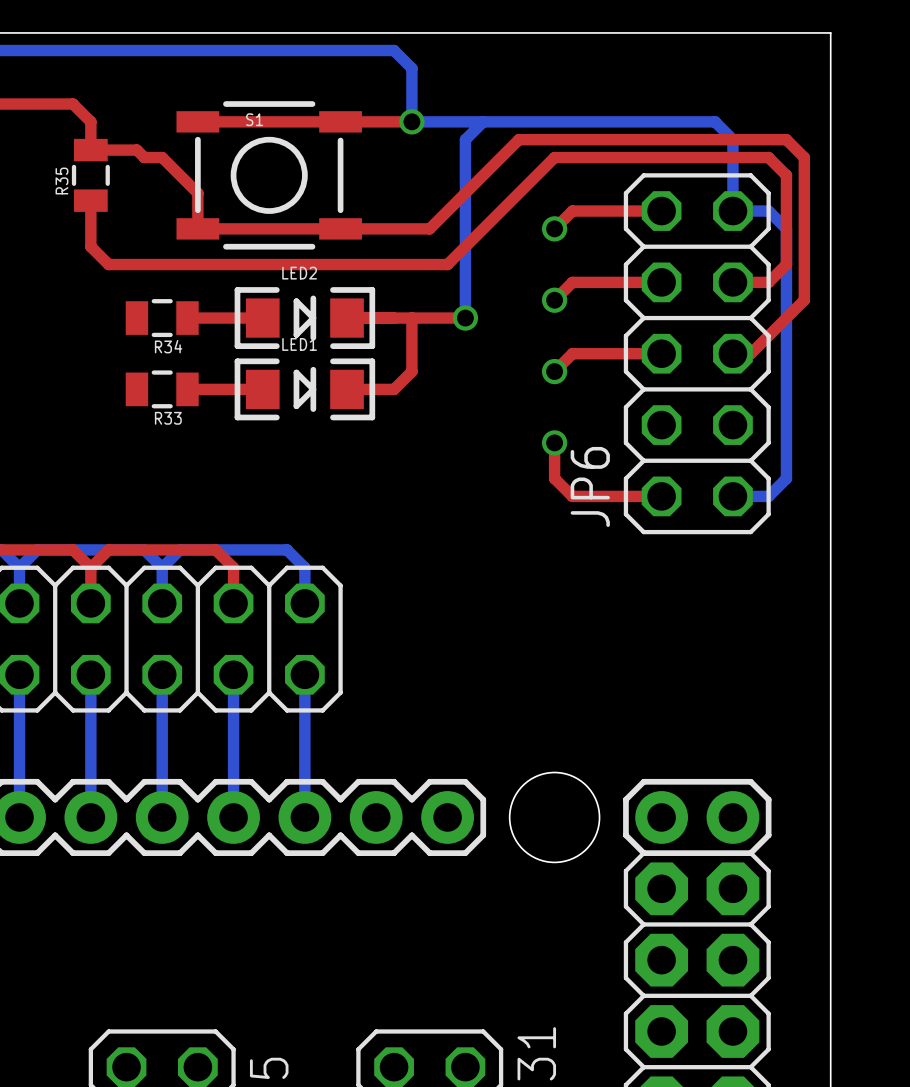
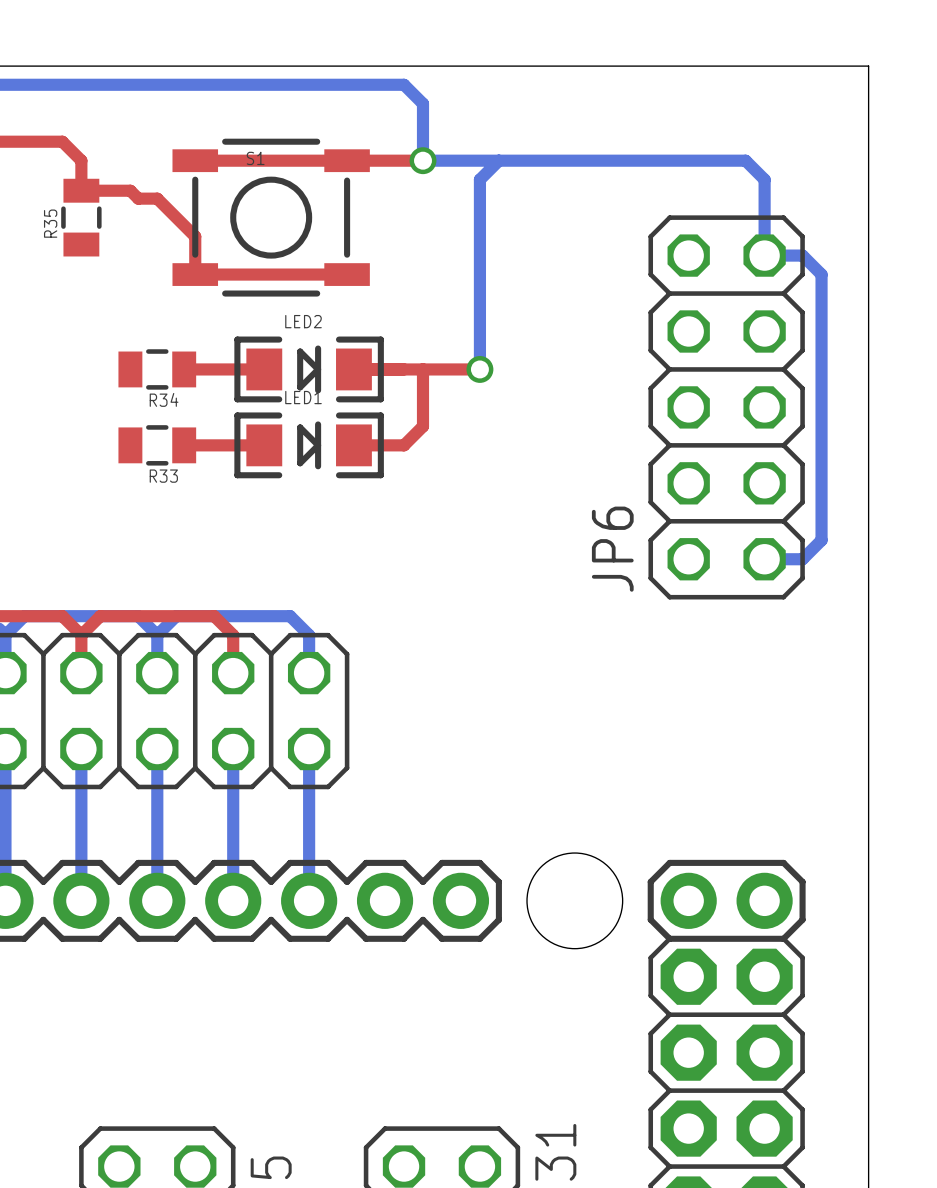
top track: (90, 200) (90, 246) (108, 264) (447, 264) (554, 157) (768, 157) (786, 175) (786, 264) (768, 282) (732, 282) -> none
top track: (661, 211) (572, 211) (554, 228) -> none
top track: (340, 228) (429, 228) (518, 139) (786, 139) (804, 157) (804, 300) (750, 353) (732, 353) -> none
via: (554, 228) -> none
top track: (661, 282) (572, 282) (554, 300) -> none
via: (554, 300) -> none
top track: (661, 353) (572, 353) (554, 371) -> none
via: (554, 371) -> none
top track: (554, 442) (554, 478) (572, 496) (661, 496) -> none
via: (554, 442) -> none

